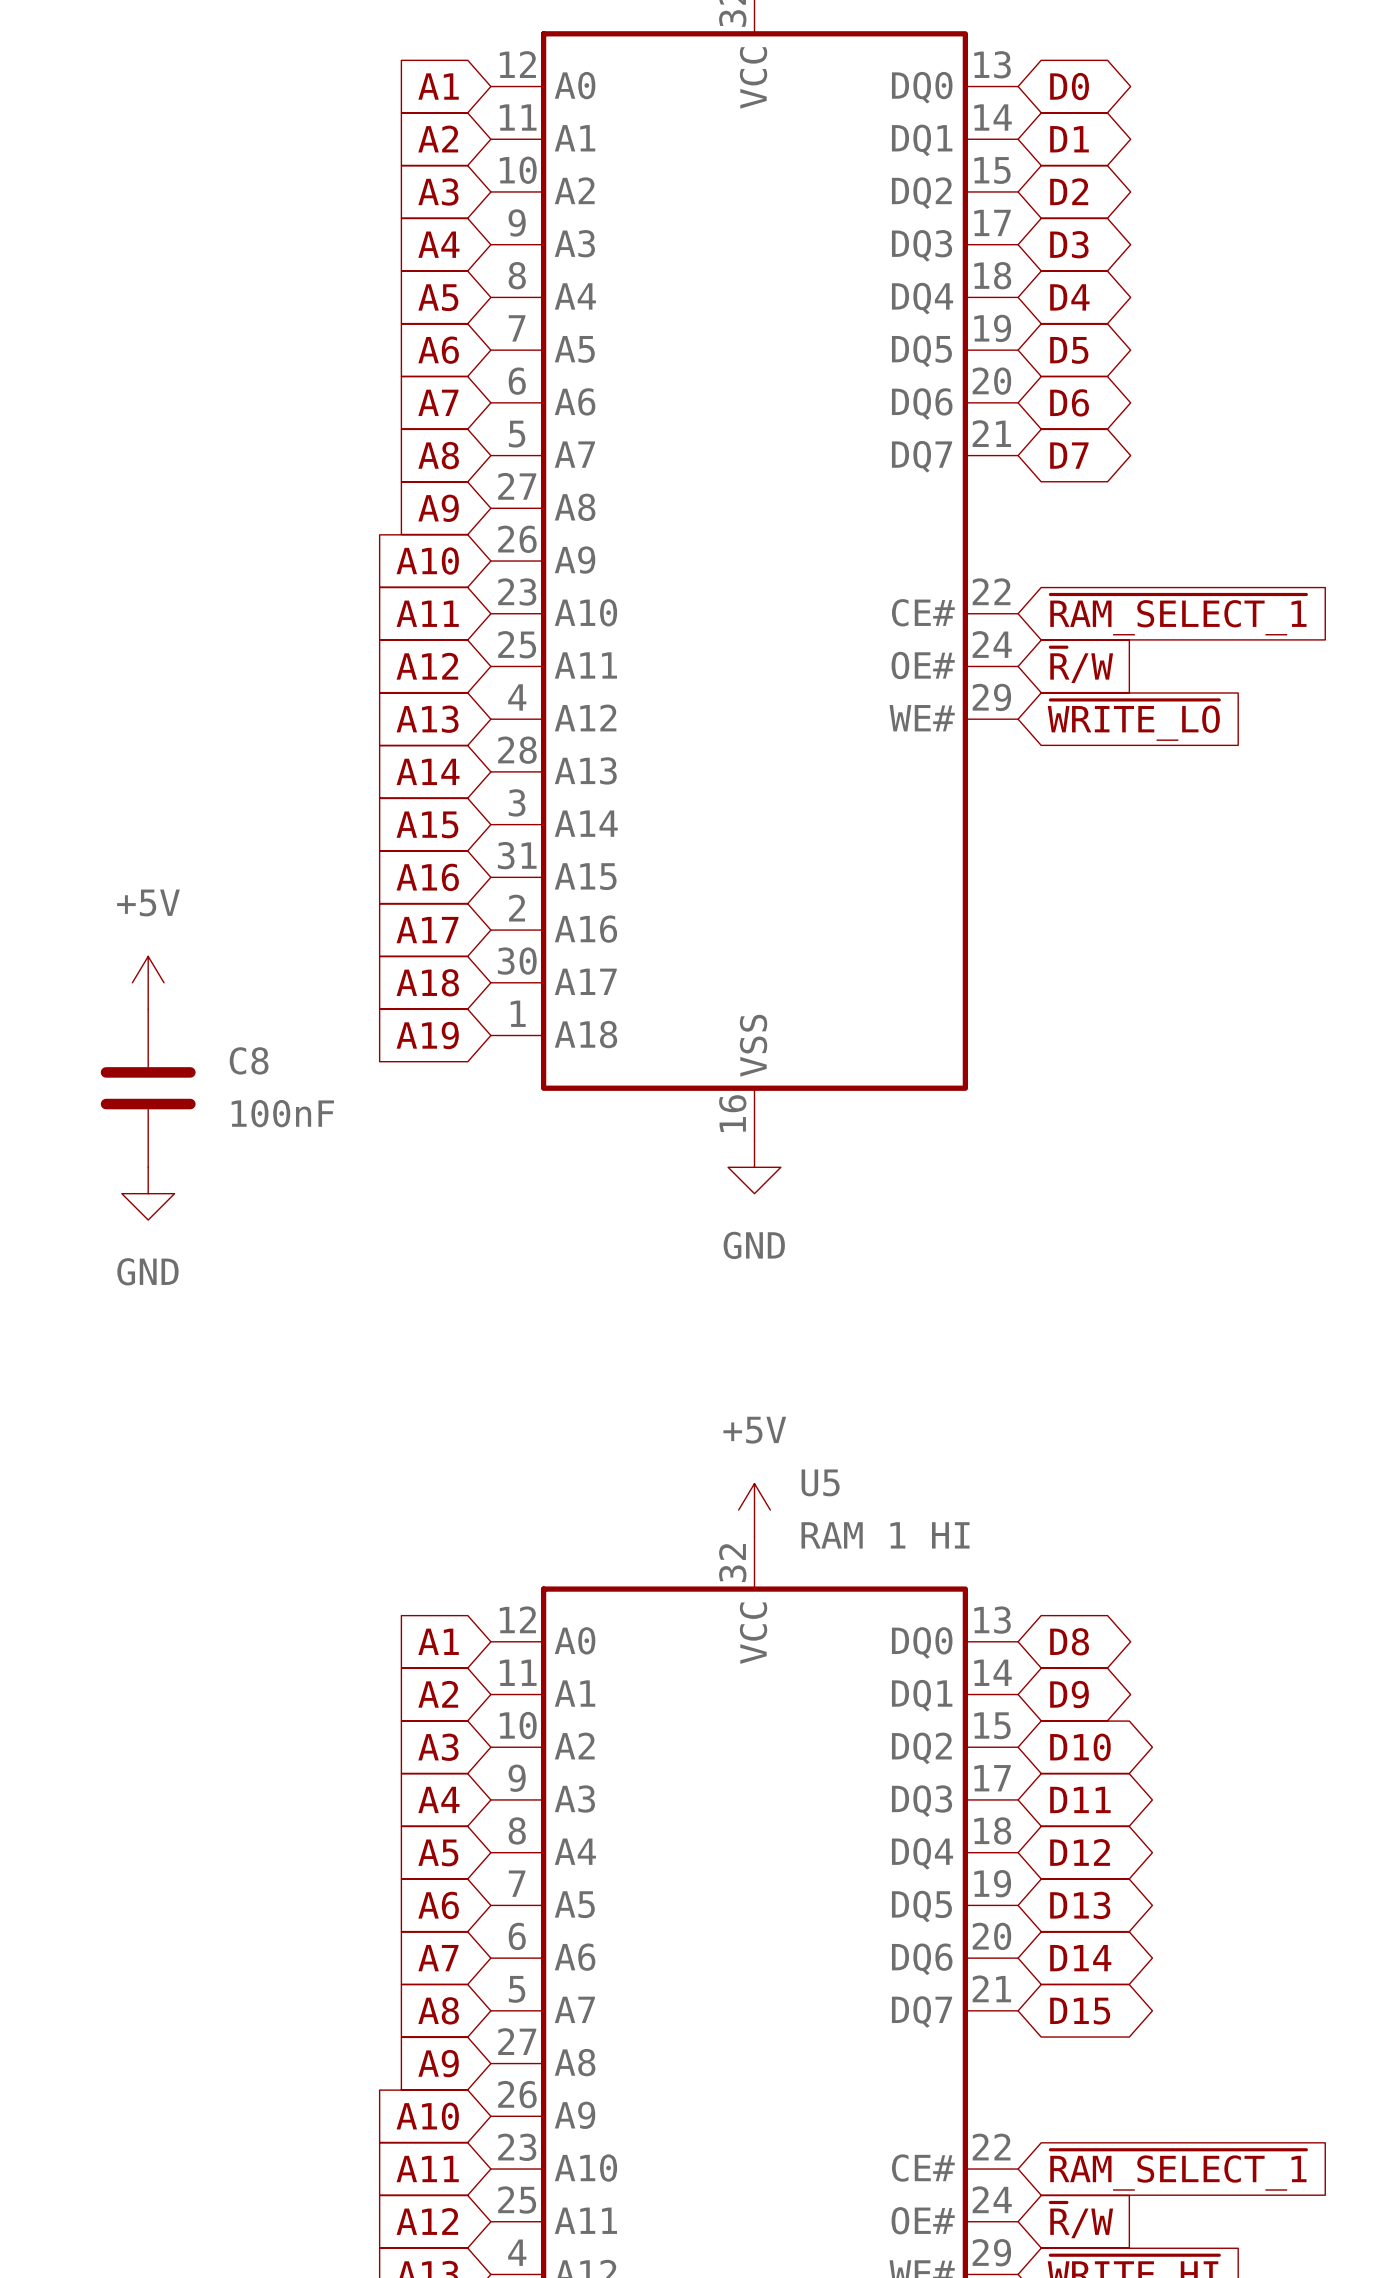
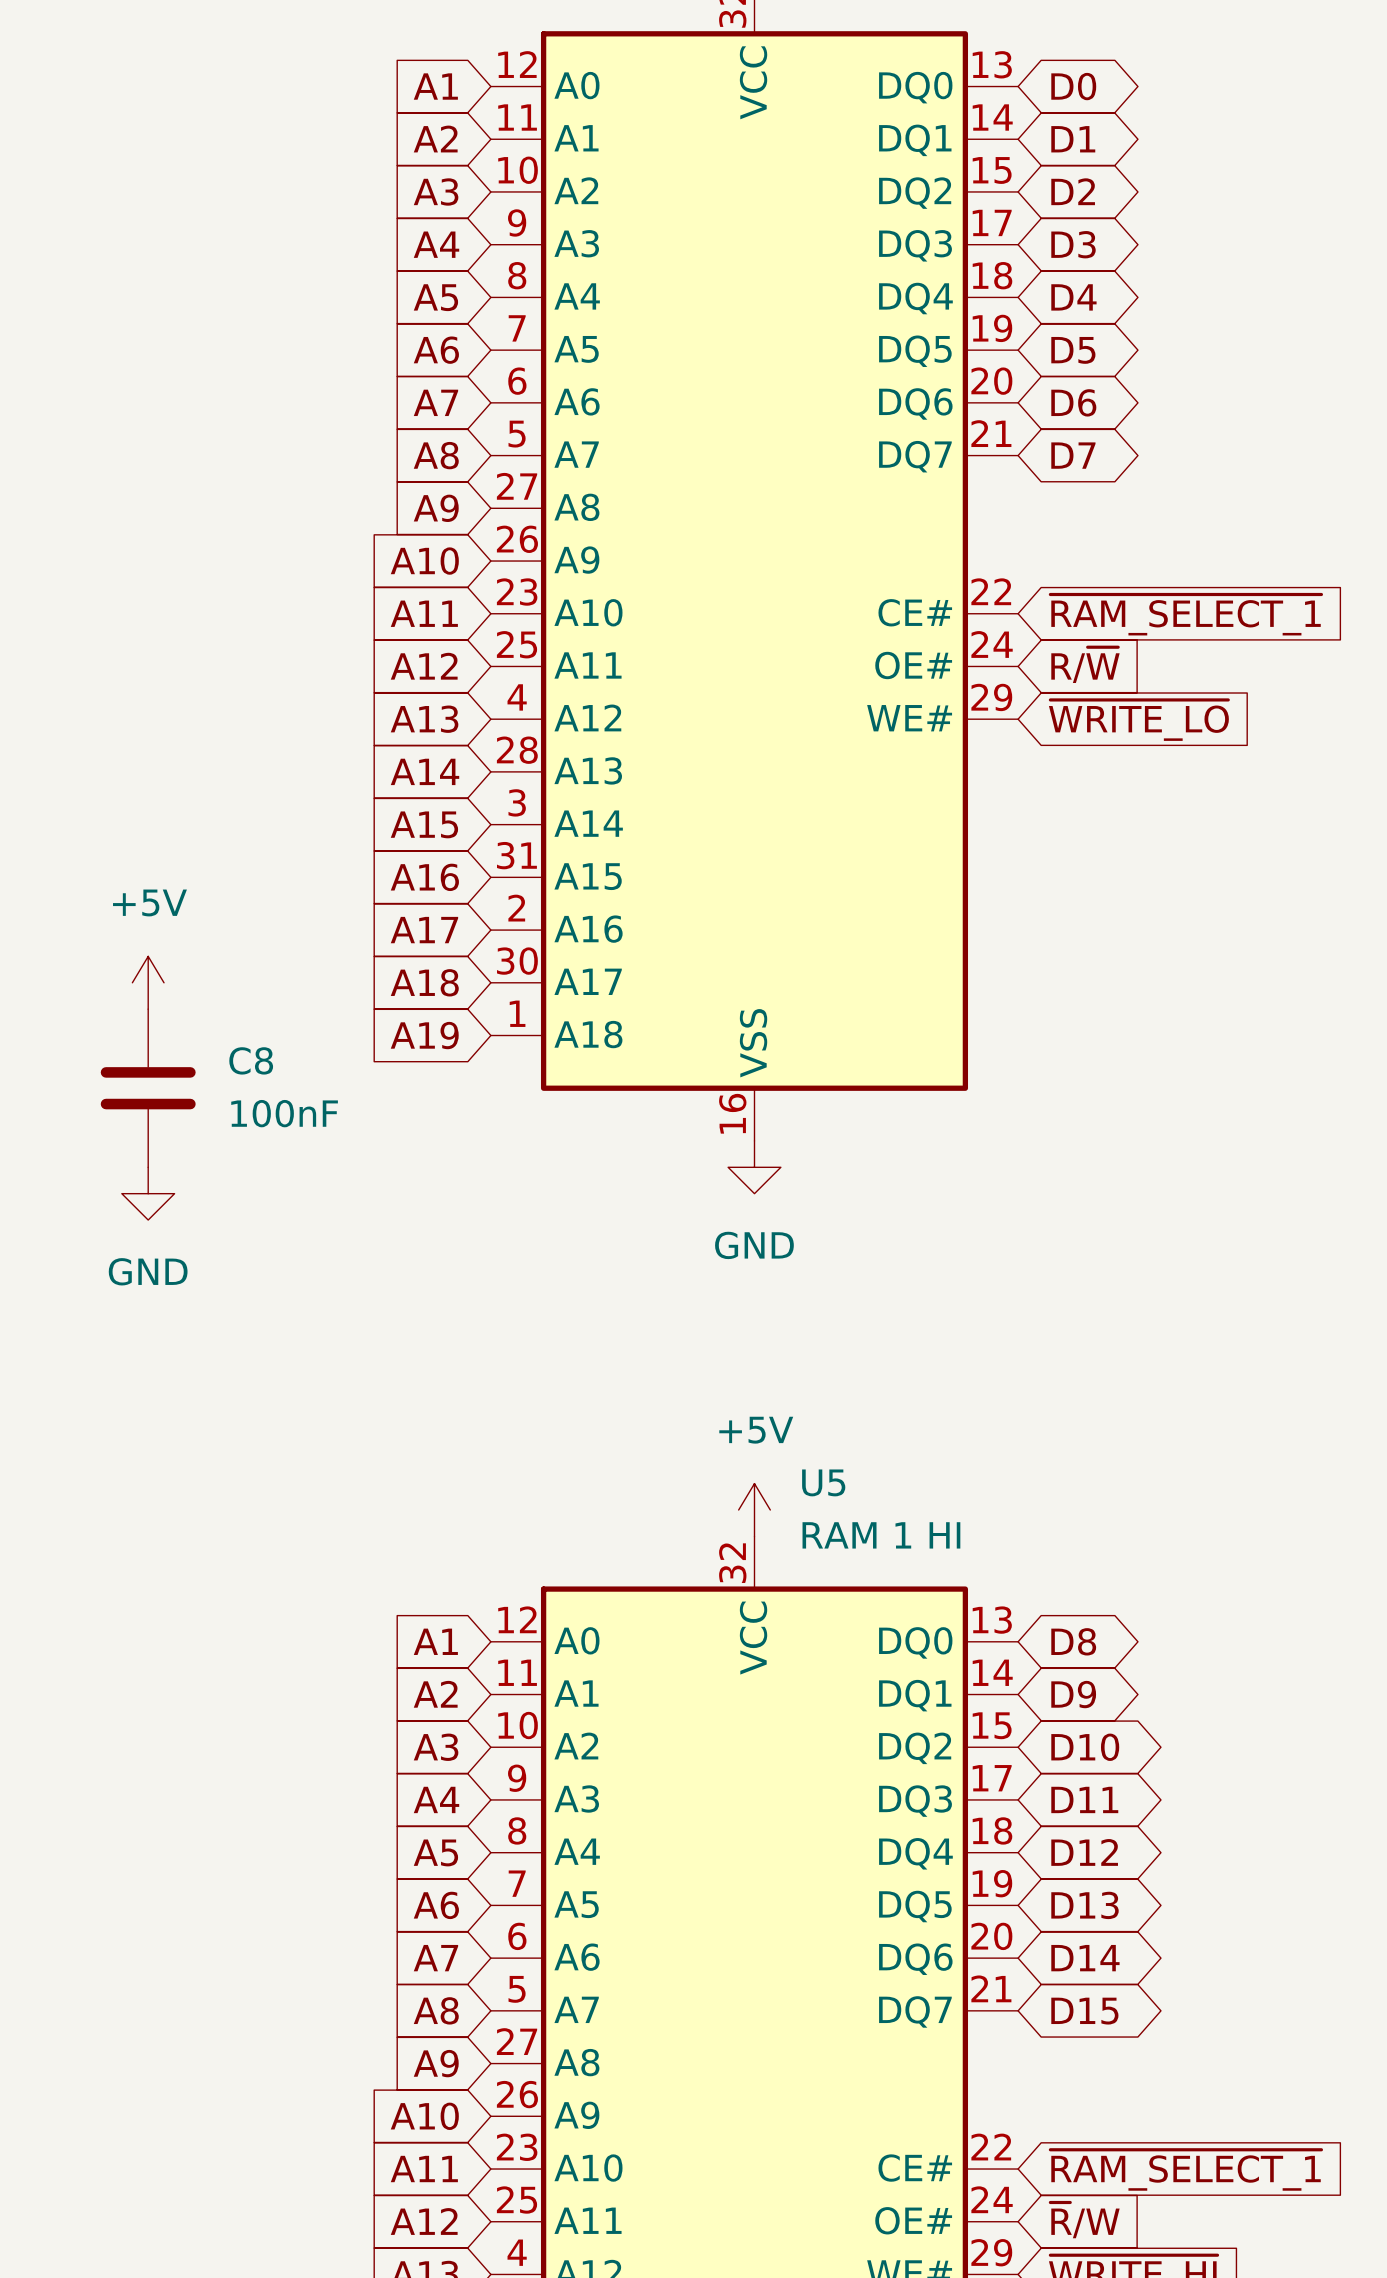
global label: ~{R}/W (1081, 665) -> R/~{W} (1085, 665)

